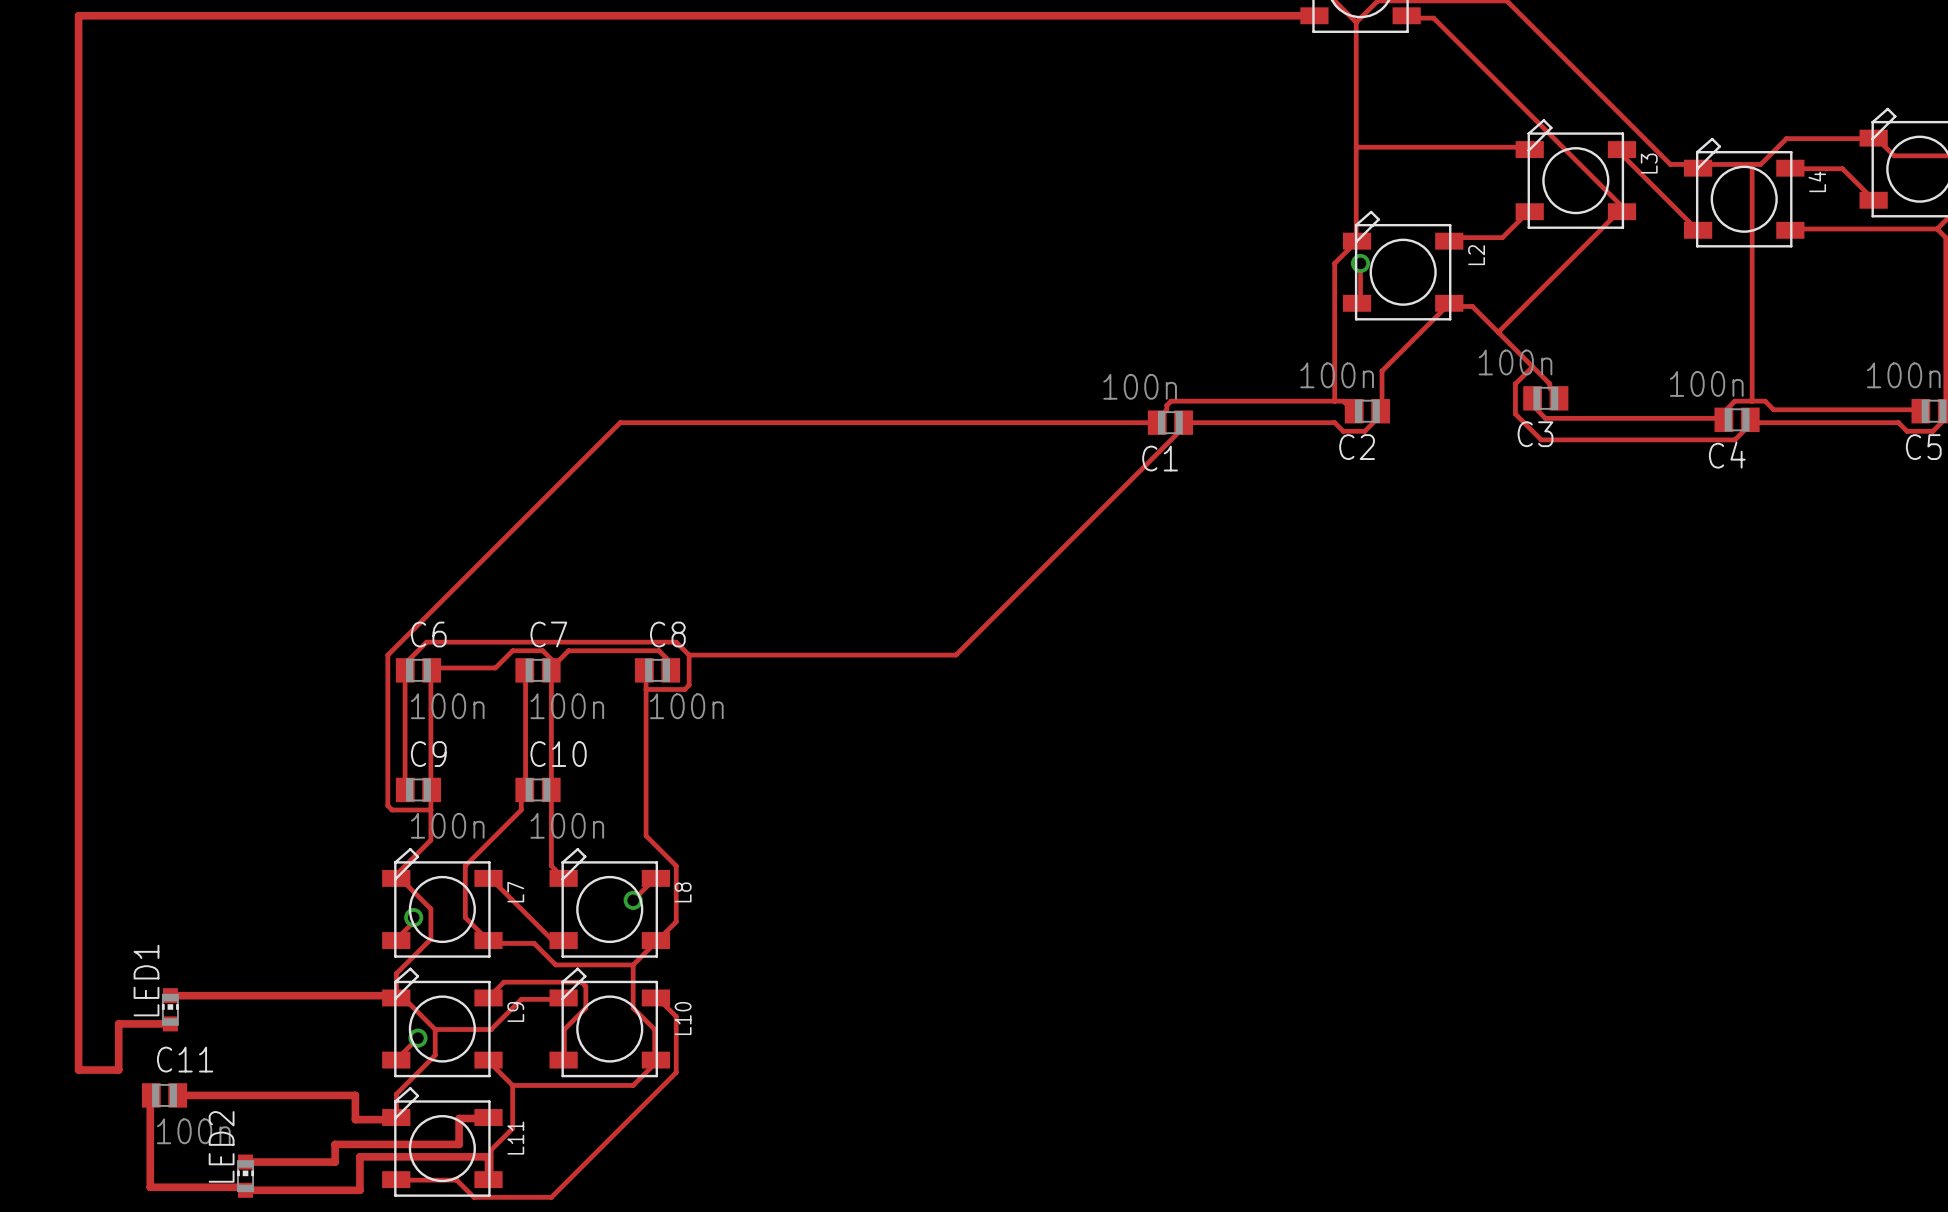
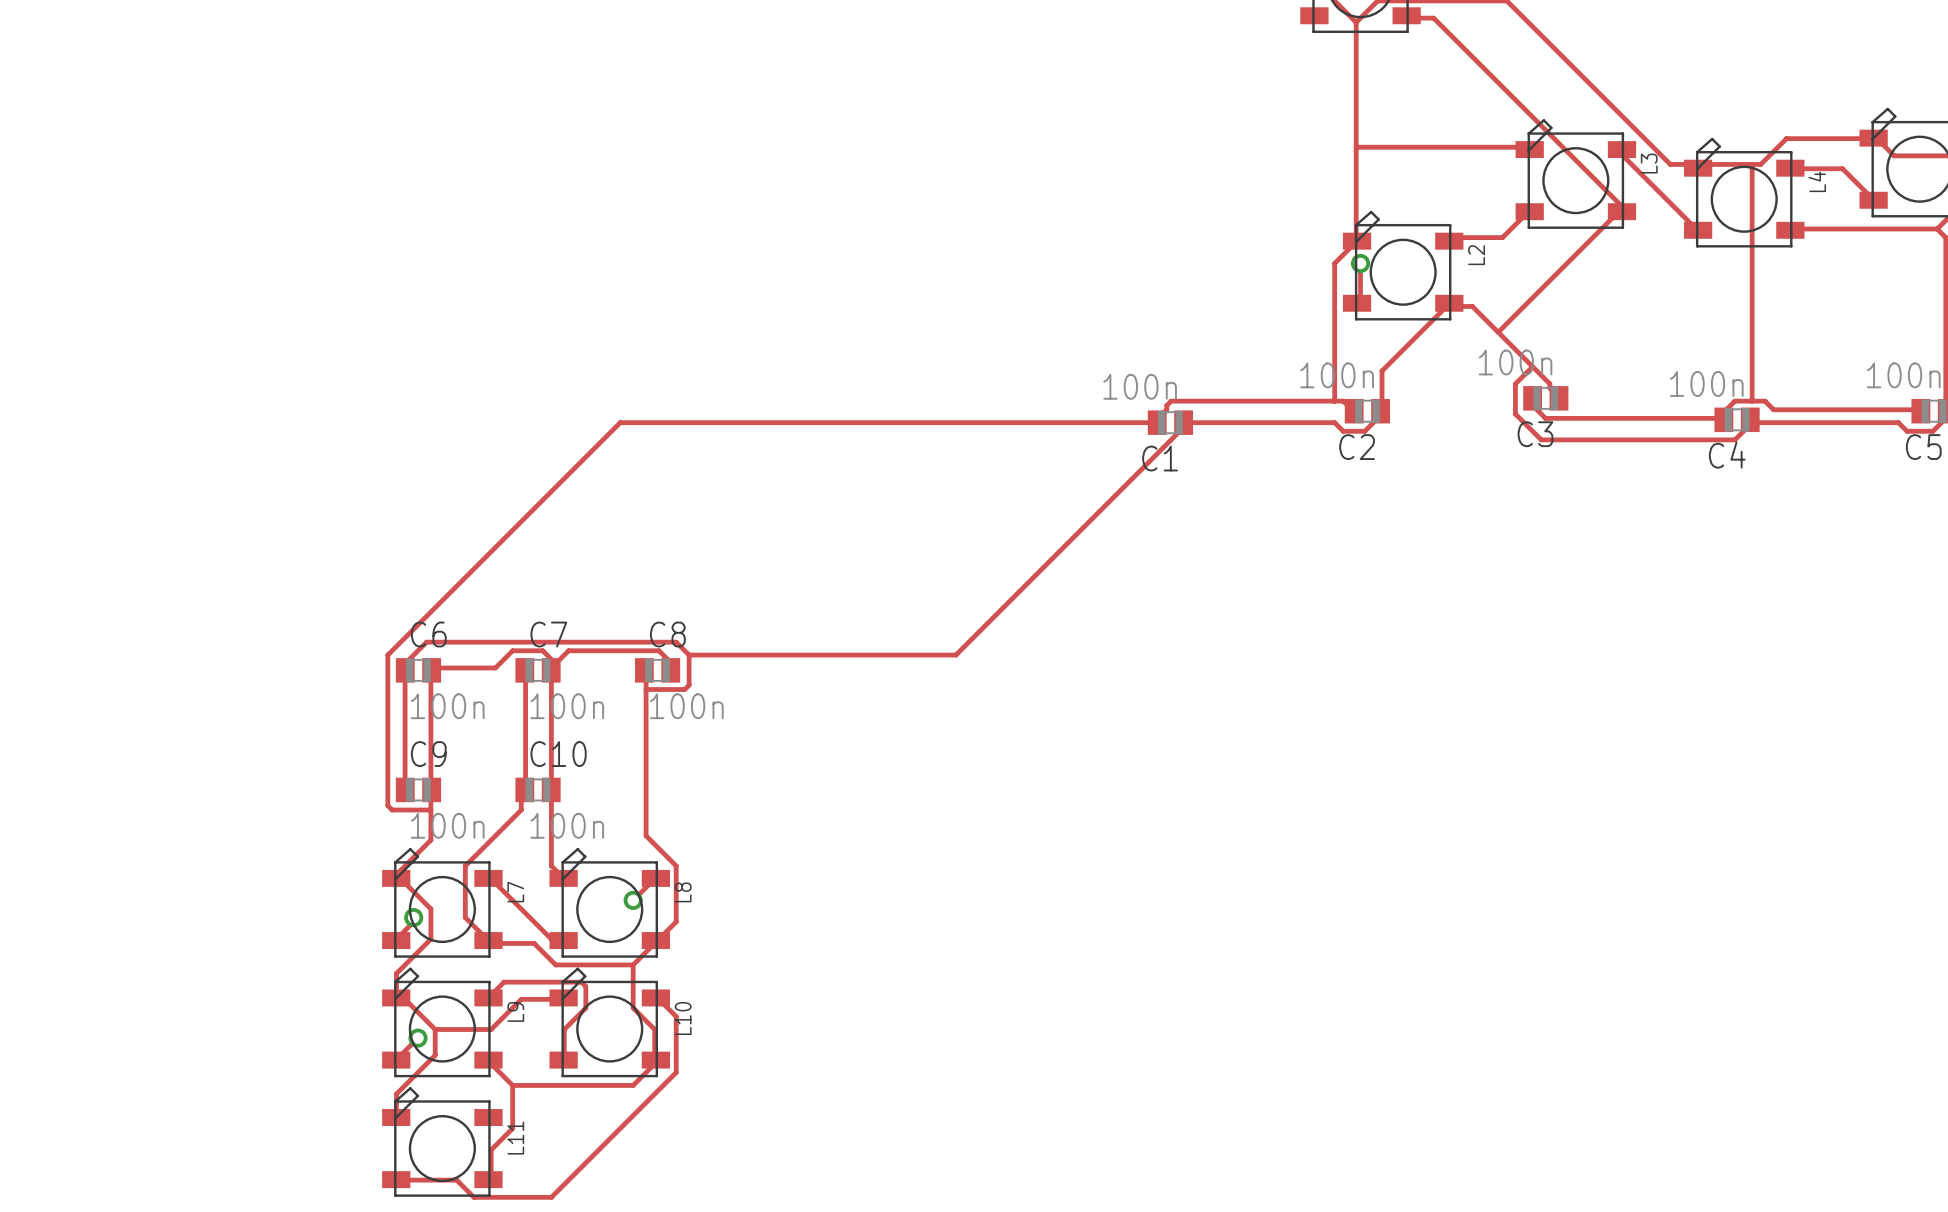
track: (1314, 15) (78, 15) (78, 1070) (118, 1070) (118, 1023) (170, 1023) -> none
track: (170, 995) (396, 995) (396, 997) -> none
LED1: (170, 1009) -> none
track: (151, 1095) (150, 1187) (245, 1187) (245, 1190) (359, 1190) (359, 1156) (488, 1156) (488, 1179) -> none
C11: 100n (164, 1095) -> none
track: (177, 1095) (355, 1095) (355, 1119) (396, 1119) (396, 1117) -> none
track: (488, 1117) (459, 1118) (459, 1144) (335, 1144) (335, 1162) (245, 1162) -> none
LED2: (245, 1176) -> none

